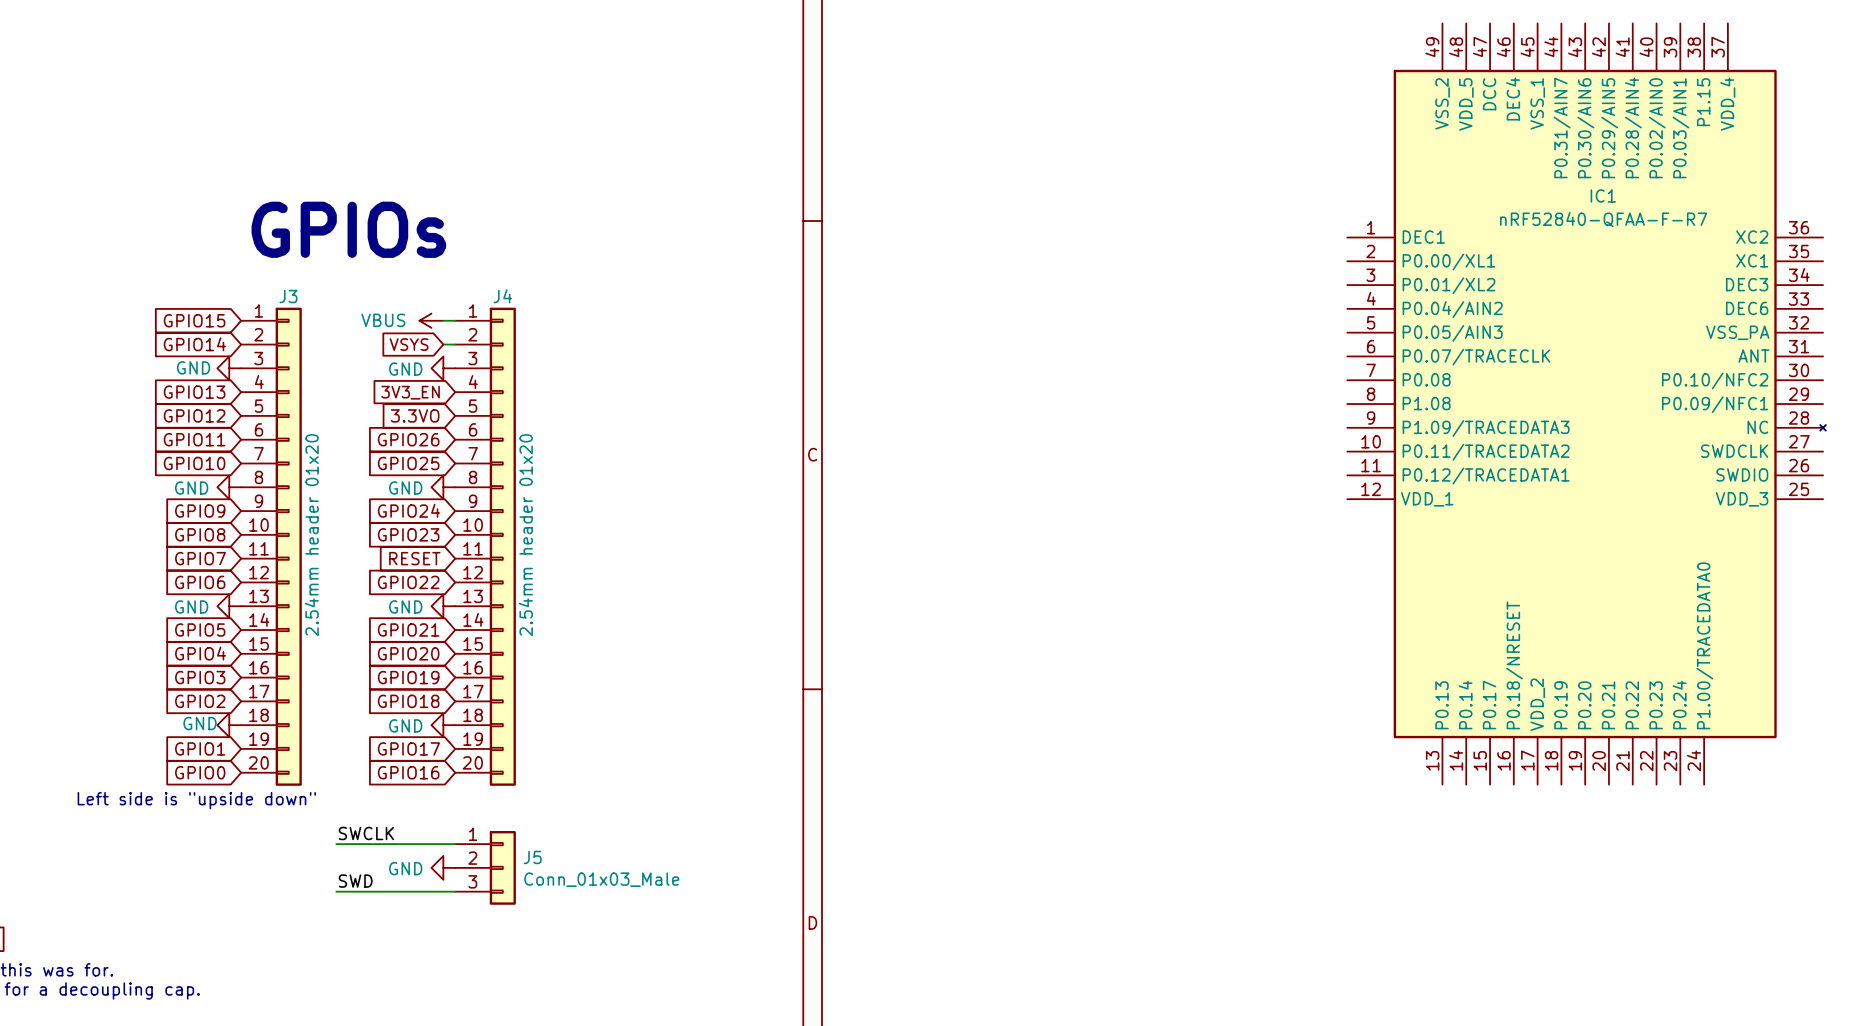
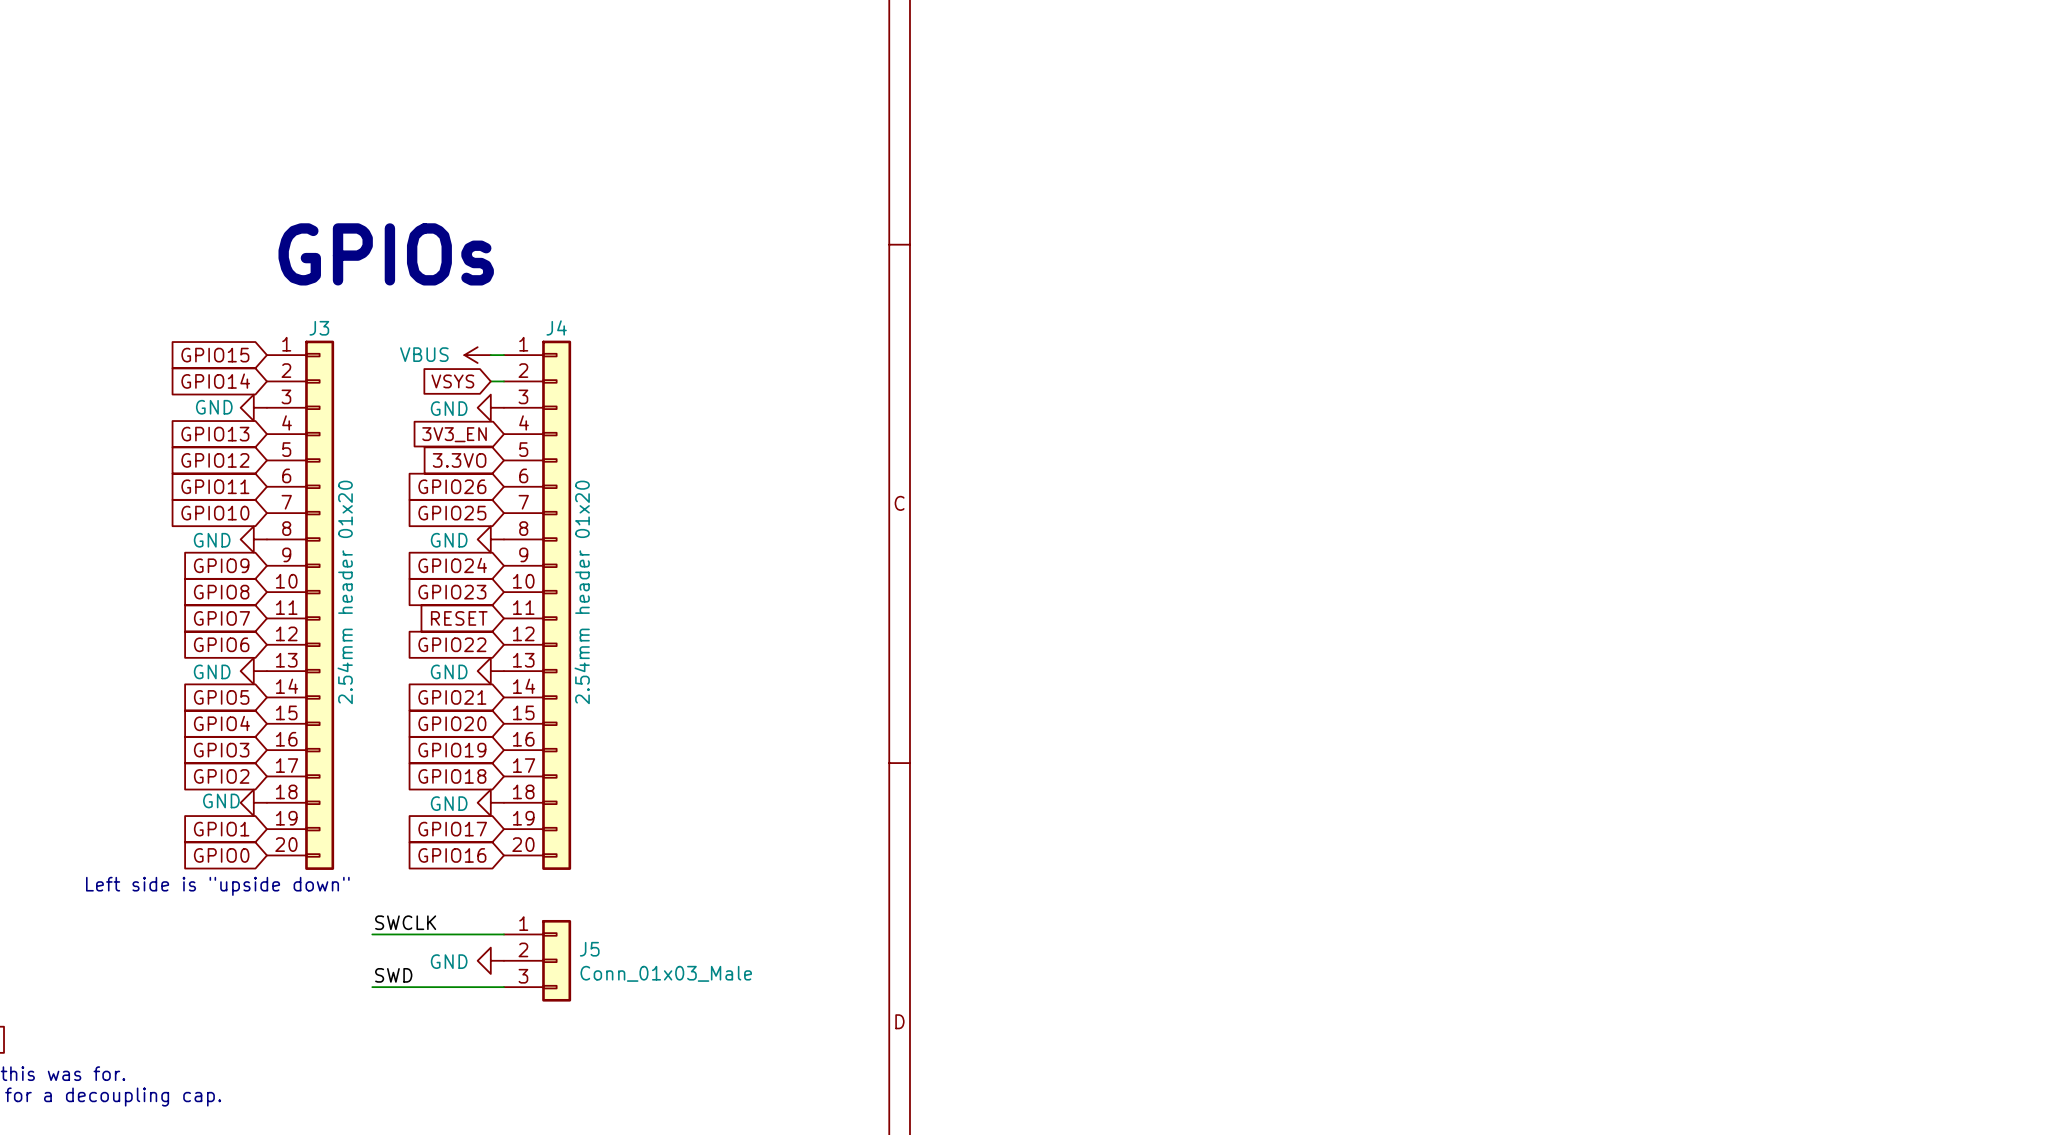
IC1: nRF52840-QFAA-F-R7 (1586, 404) -> none

